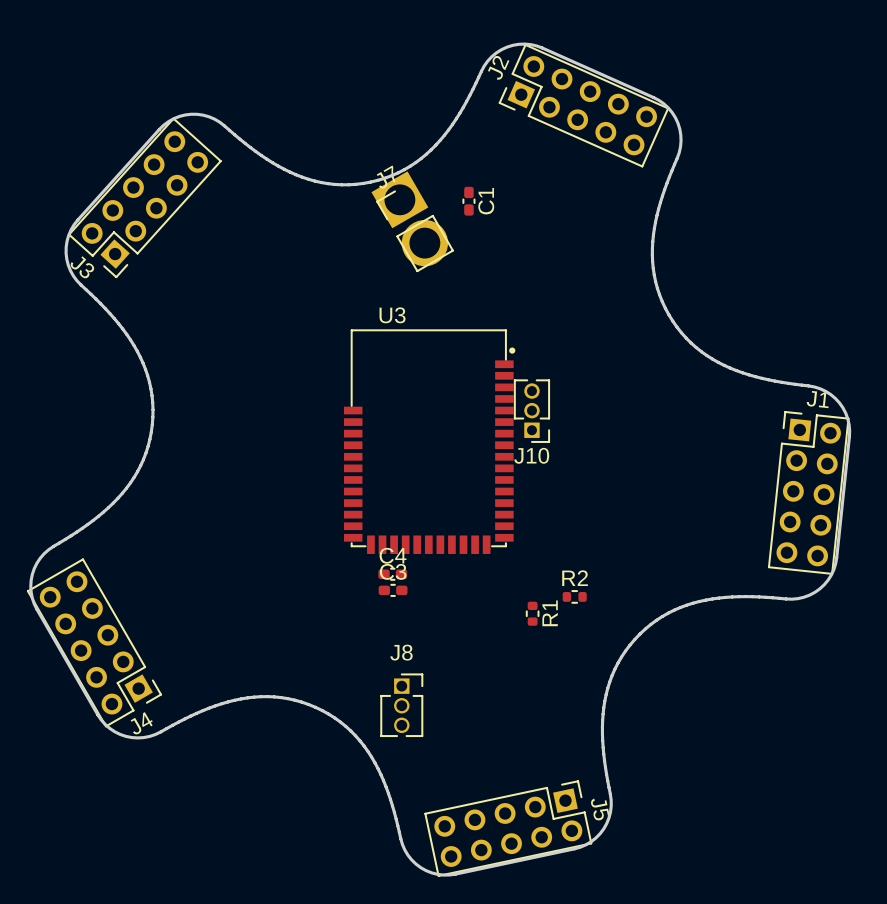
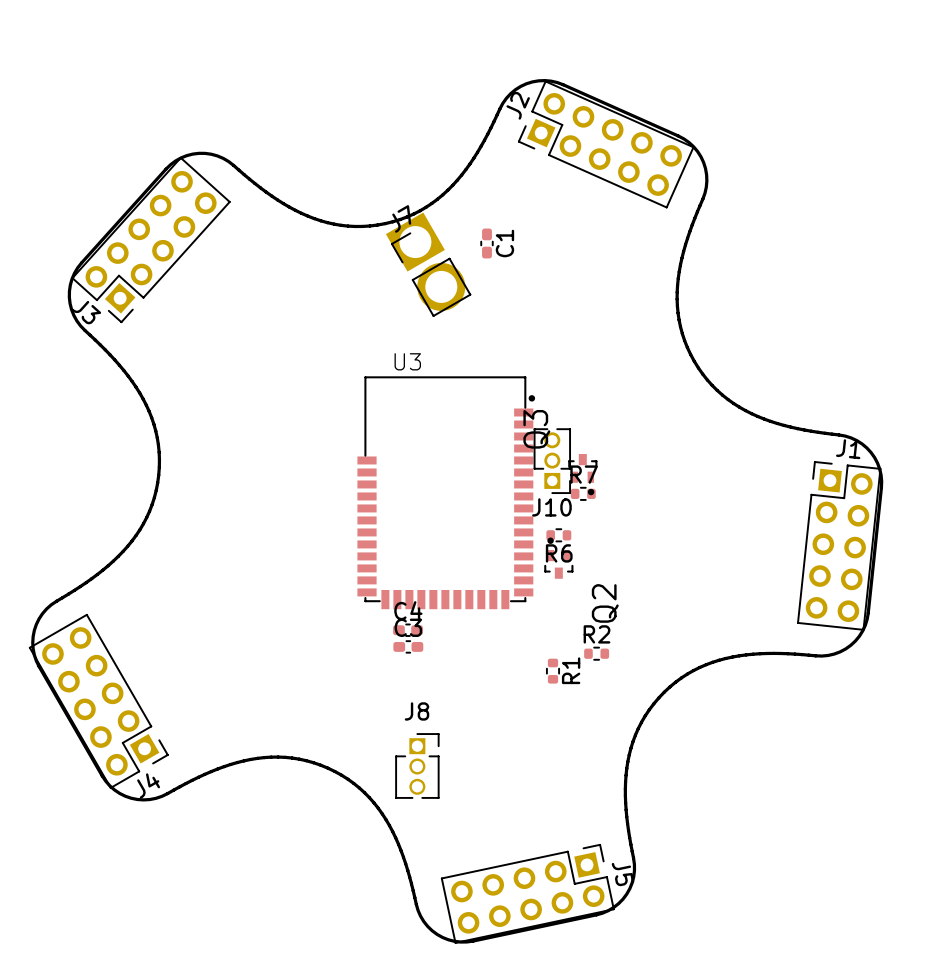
Q3: none -> (582, 474)
R7: none -> (583, 493)
R6: none -> (558, 535)
Q2: none -> (558, 558)

